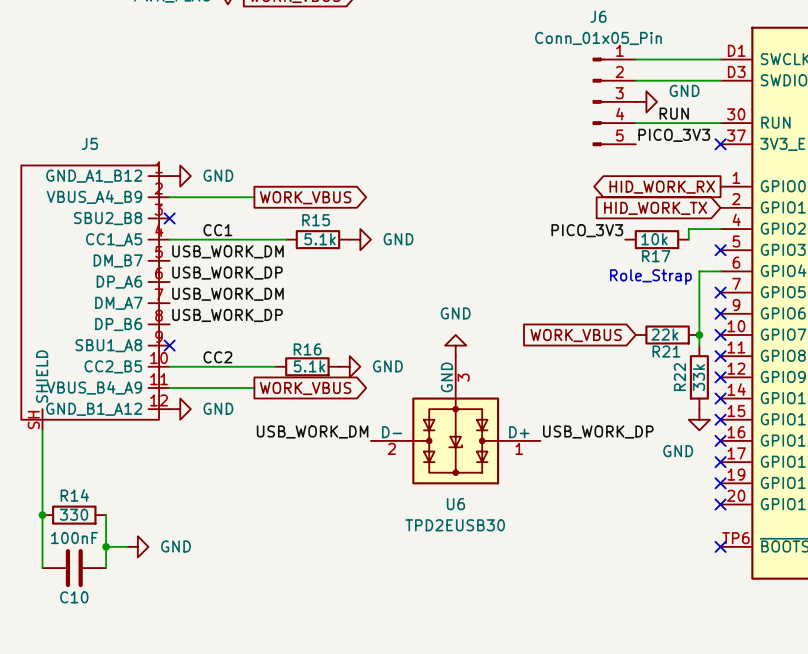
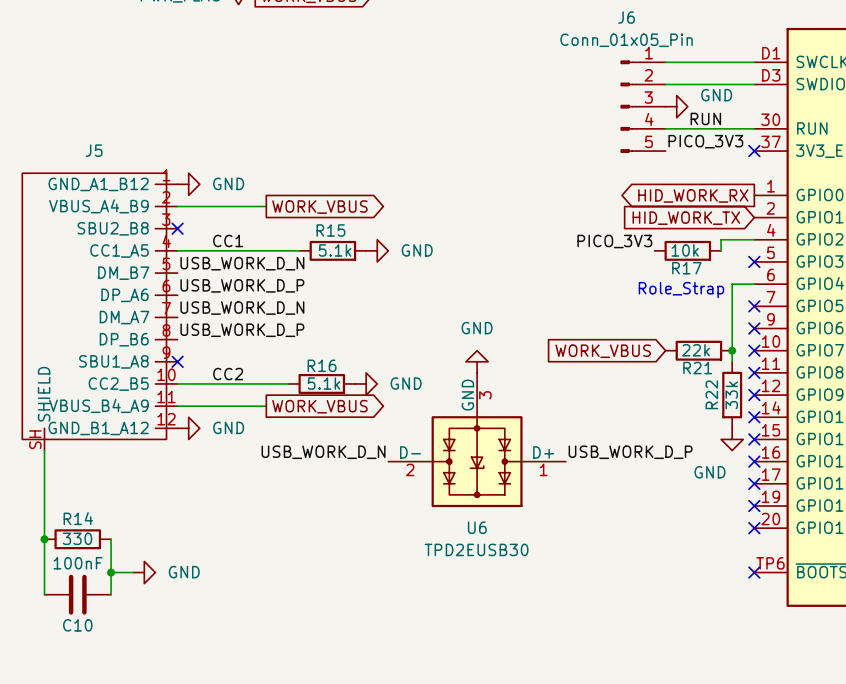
label: USB_WORK_DM (227, 251) -> USB_WORK_D_N (242, 263)
label: USB_WORK_DP (227, 273) -> USB_WORK_D_P (242, 285)
label: USB_WORK_DM (227, 294) -> USB_WORK_D_N (242, 308)
label: USB_WORK_DP (227, 315) -> USB_WORK_D_P (242, 330)
label: USB_WORK_DM (312, 431) -> USB_WORK_D_N (323, 452)
label: USB_WORK_DP (598, 431) -> USB_WORK_D_P (630, 452)

